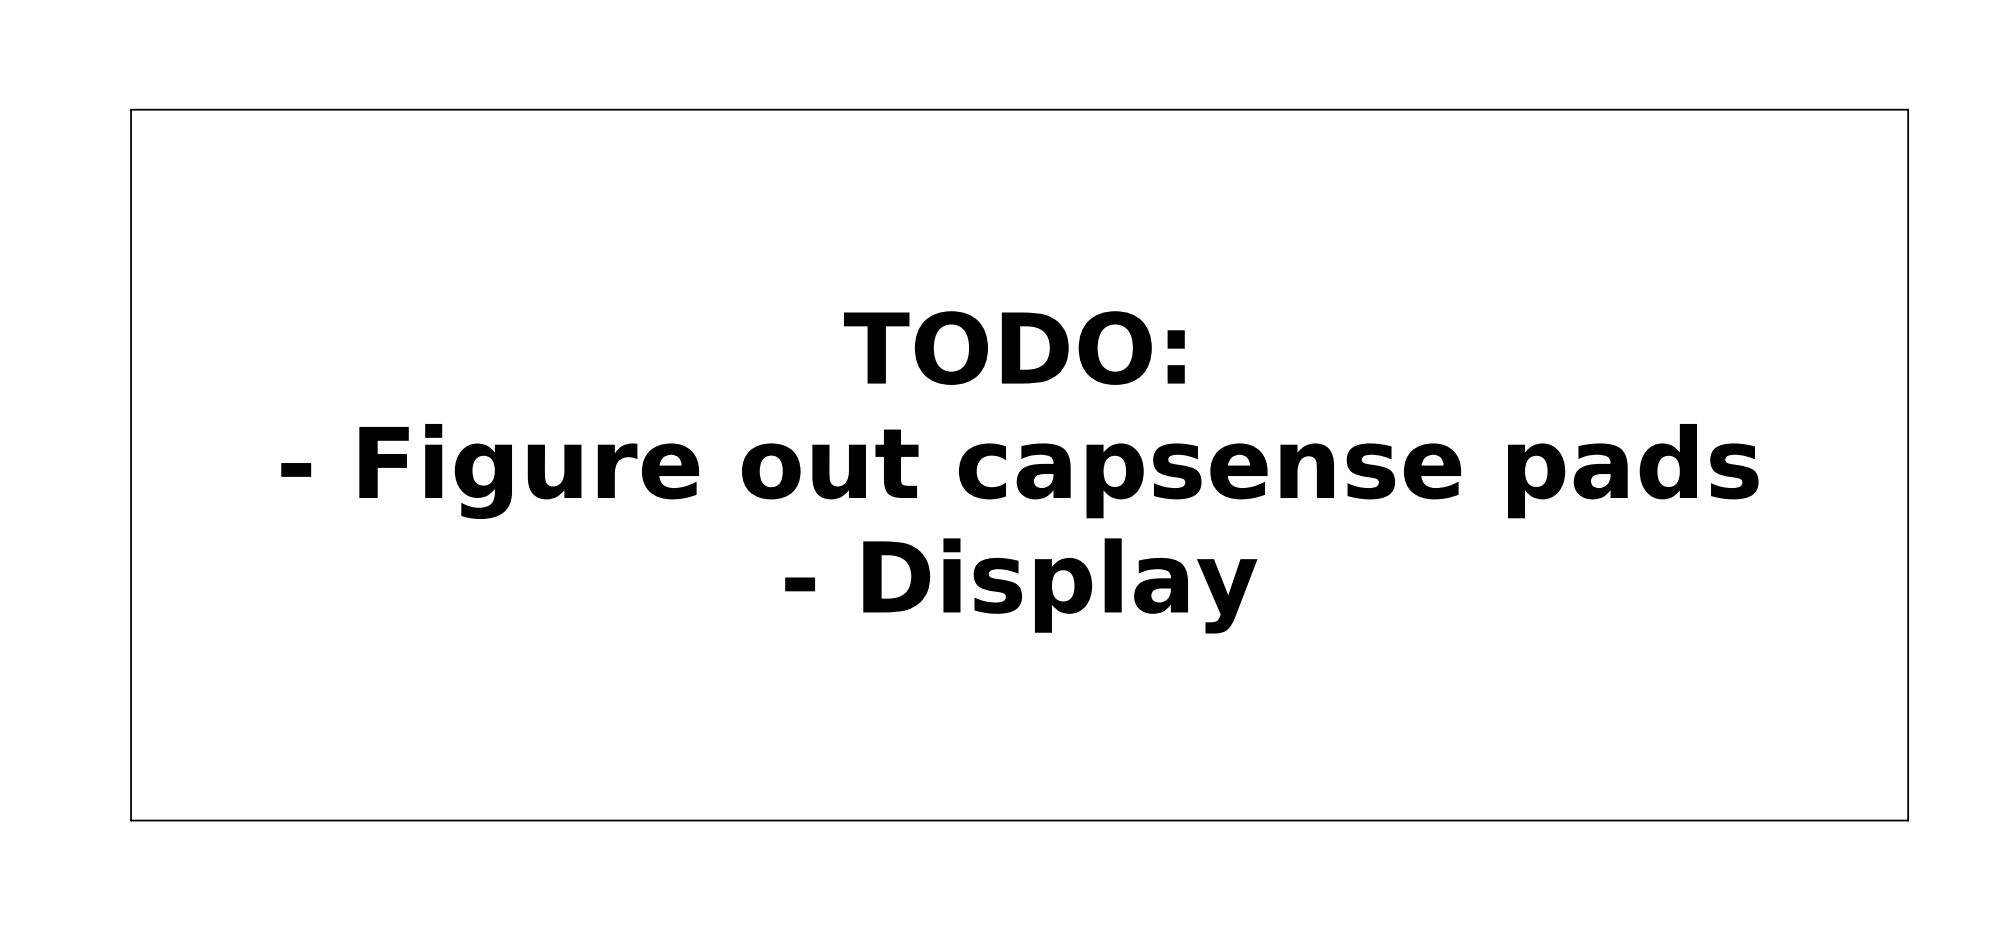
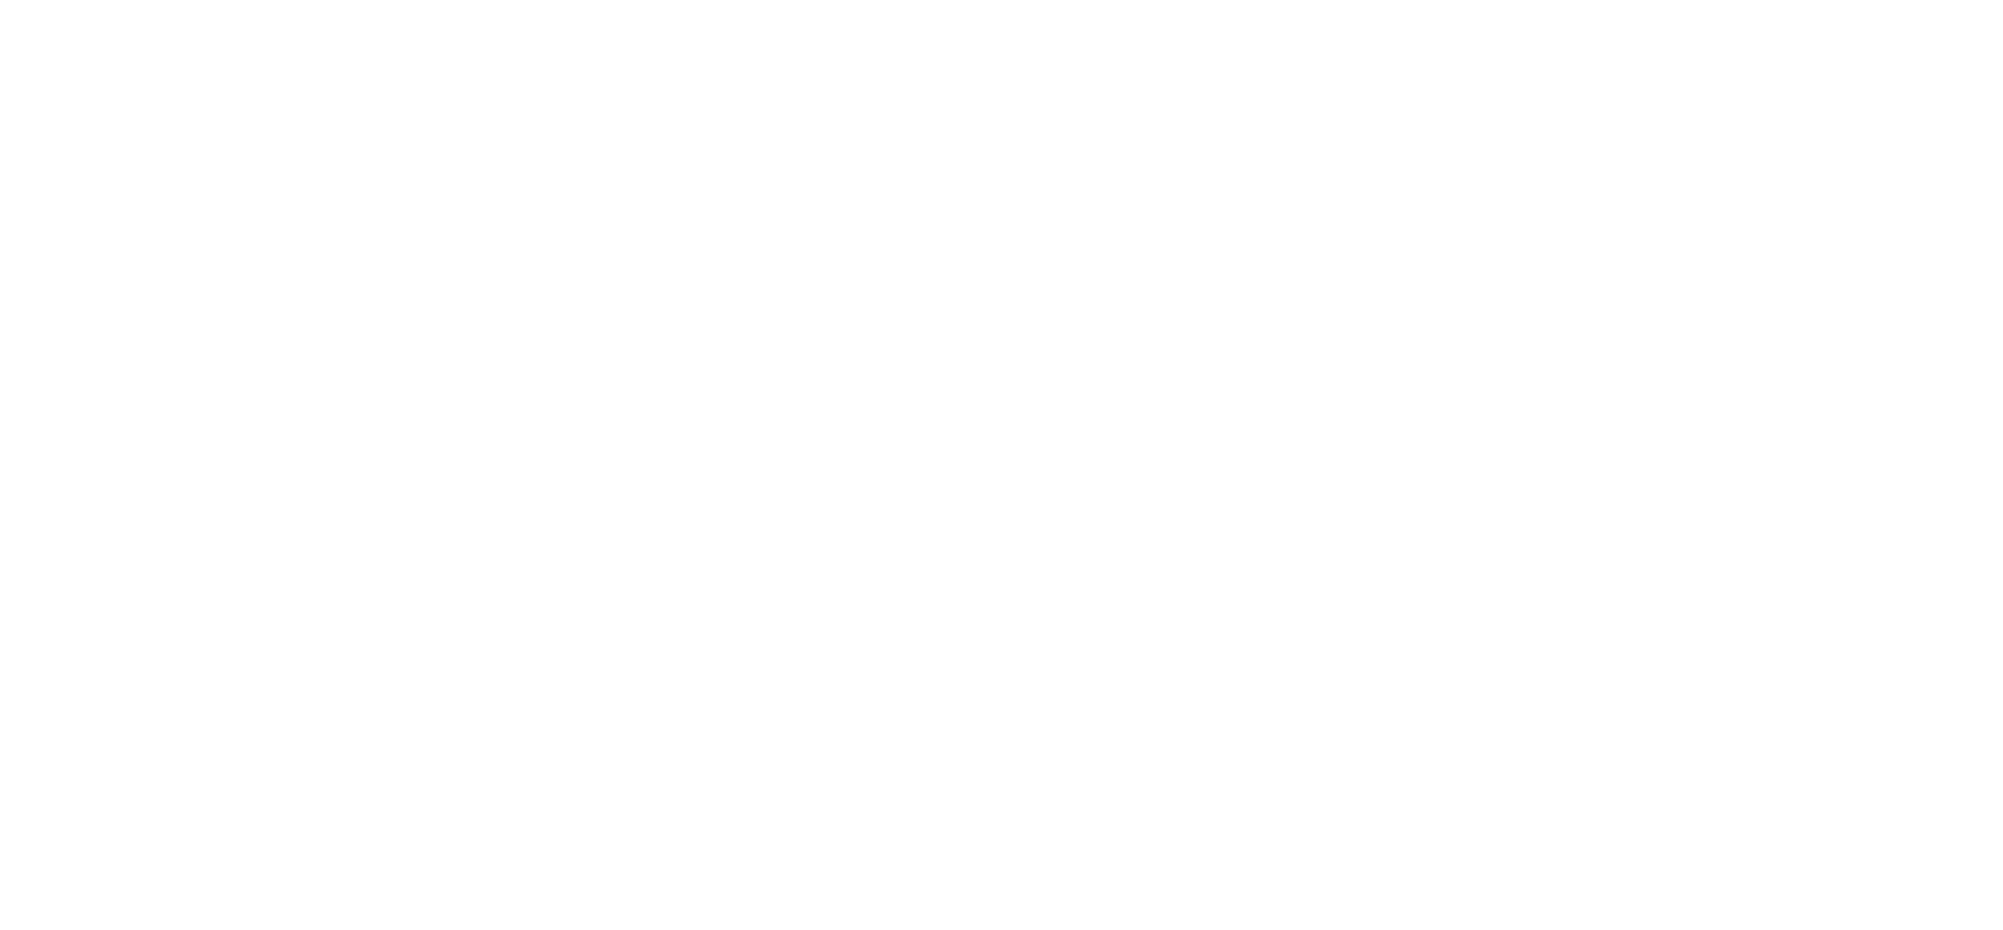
line: (131, 109) (1908, 109) (1908, 820) (131, 820) (131, 109) -> none
text: TODO: (1014, 348) -> none
text: - Figure out capsense pads (1019, 471) -> none
text: - Display (1021, 585) -> none

